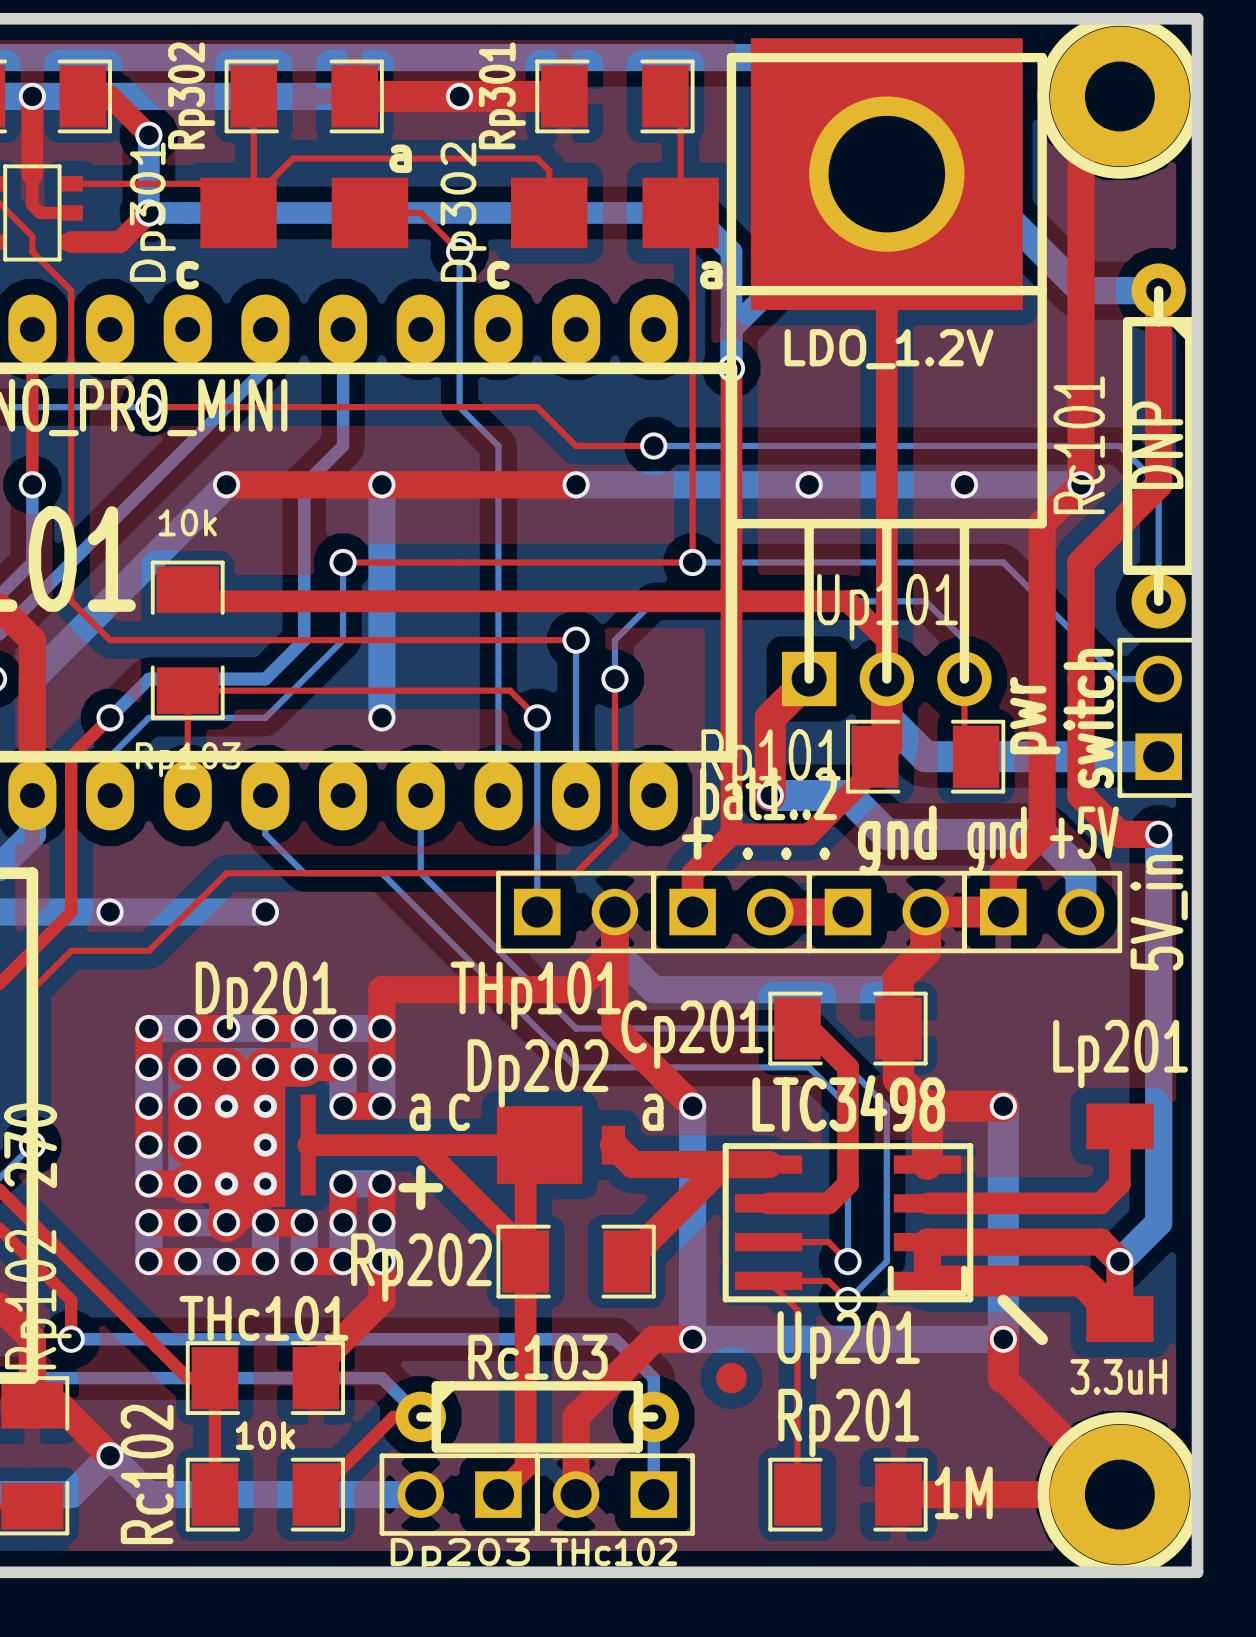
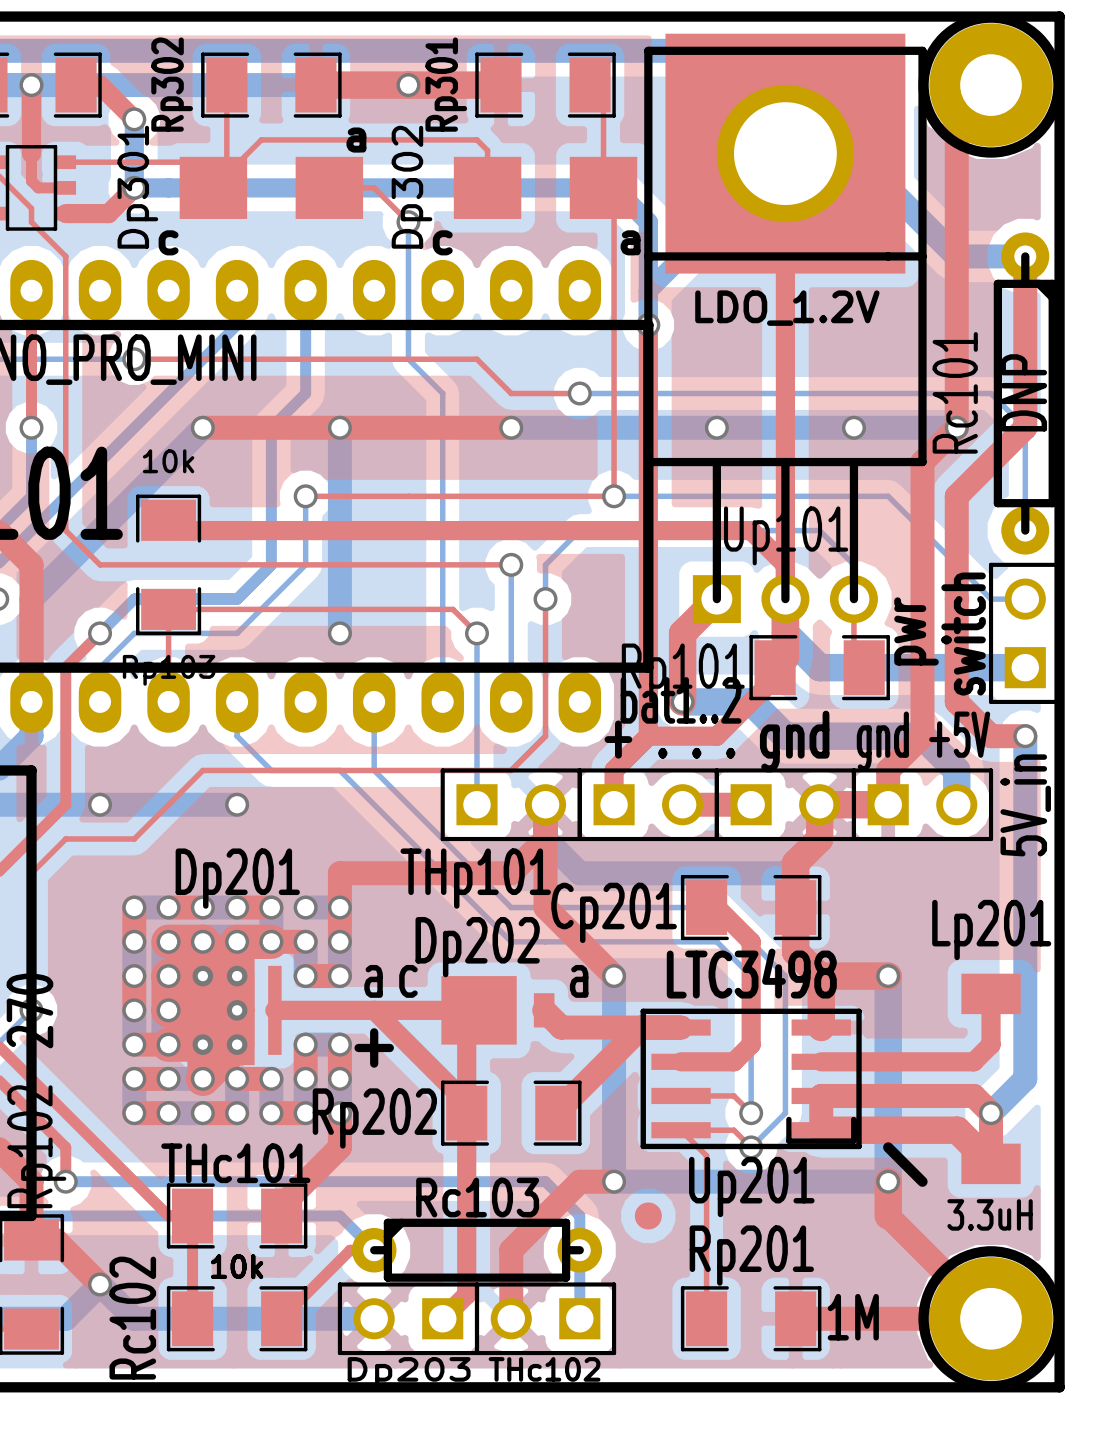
Rc102 name position: Rc102 (147, 1474) -> Rc102 (132, 1318)

